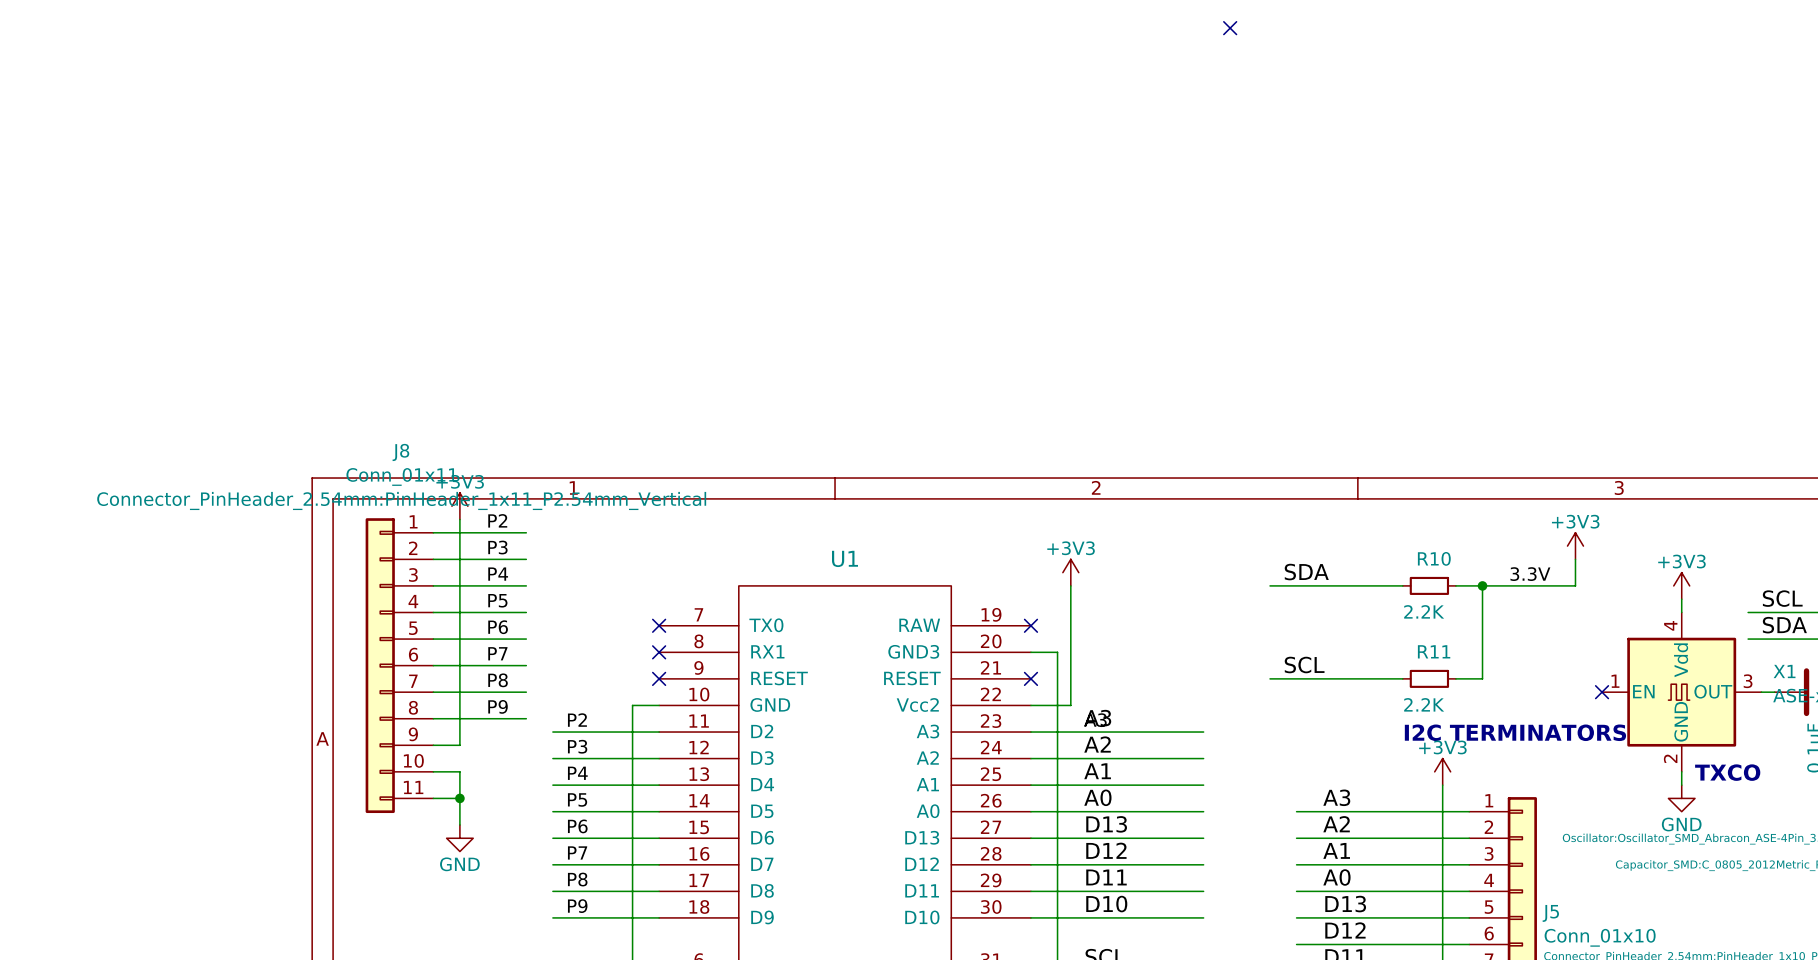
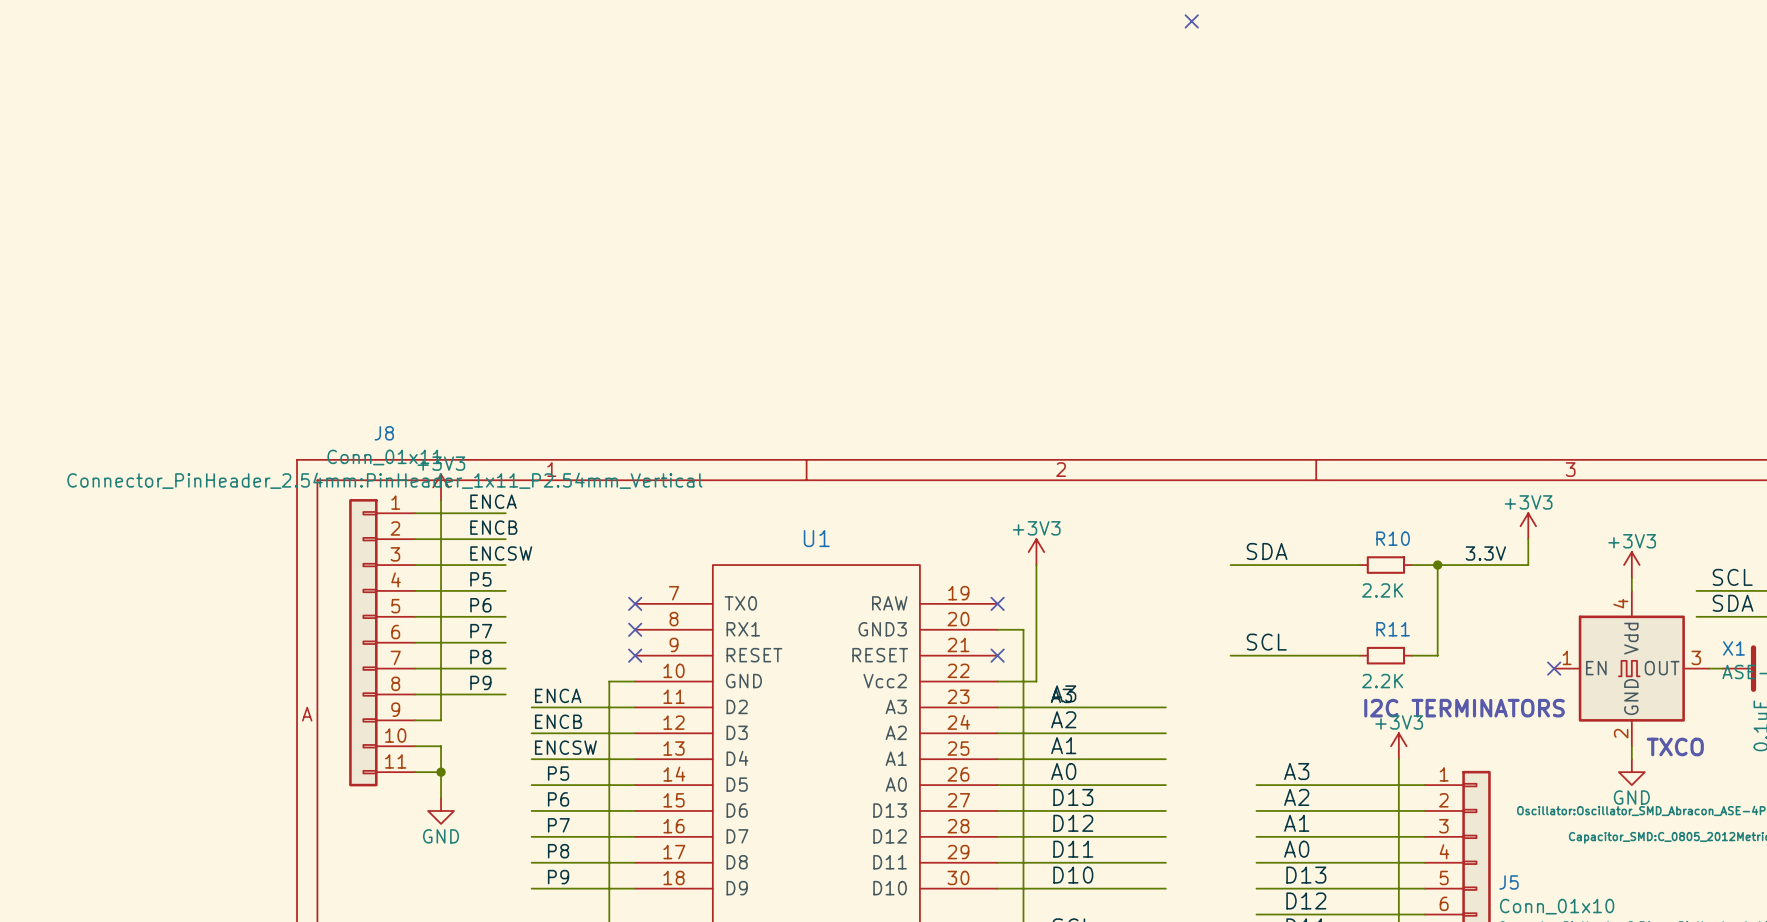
label: P2 (497, 520) -> ENCA (493, 501)
label: P3 (497, 547) -> ENCB (493, 527)
label: P4 (498, 574) -> ENCSW (501, 553)
label: P2 (577, 720) -> none
label: none -> ENCA (558, 695)
label: P3 (577, 746) -> none
label: none -> ENCB (558, 721)
label: P4 (577, 773) -> none
label: none -> ENCSW (565, 747)

